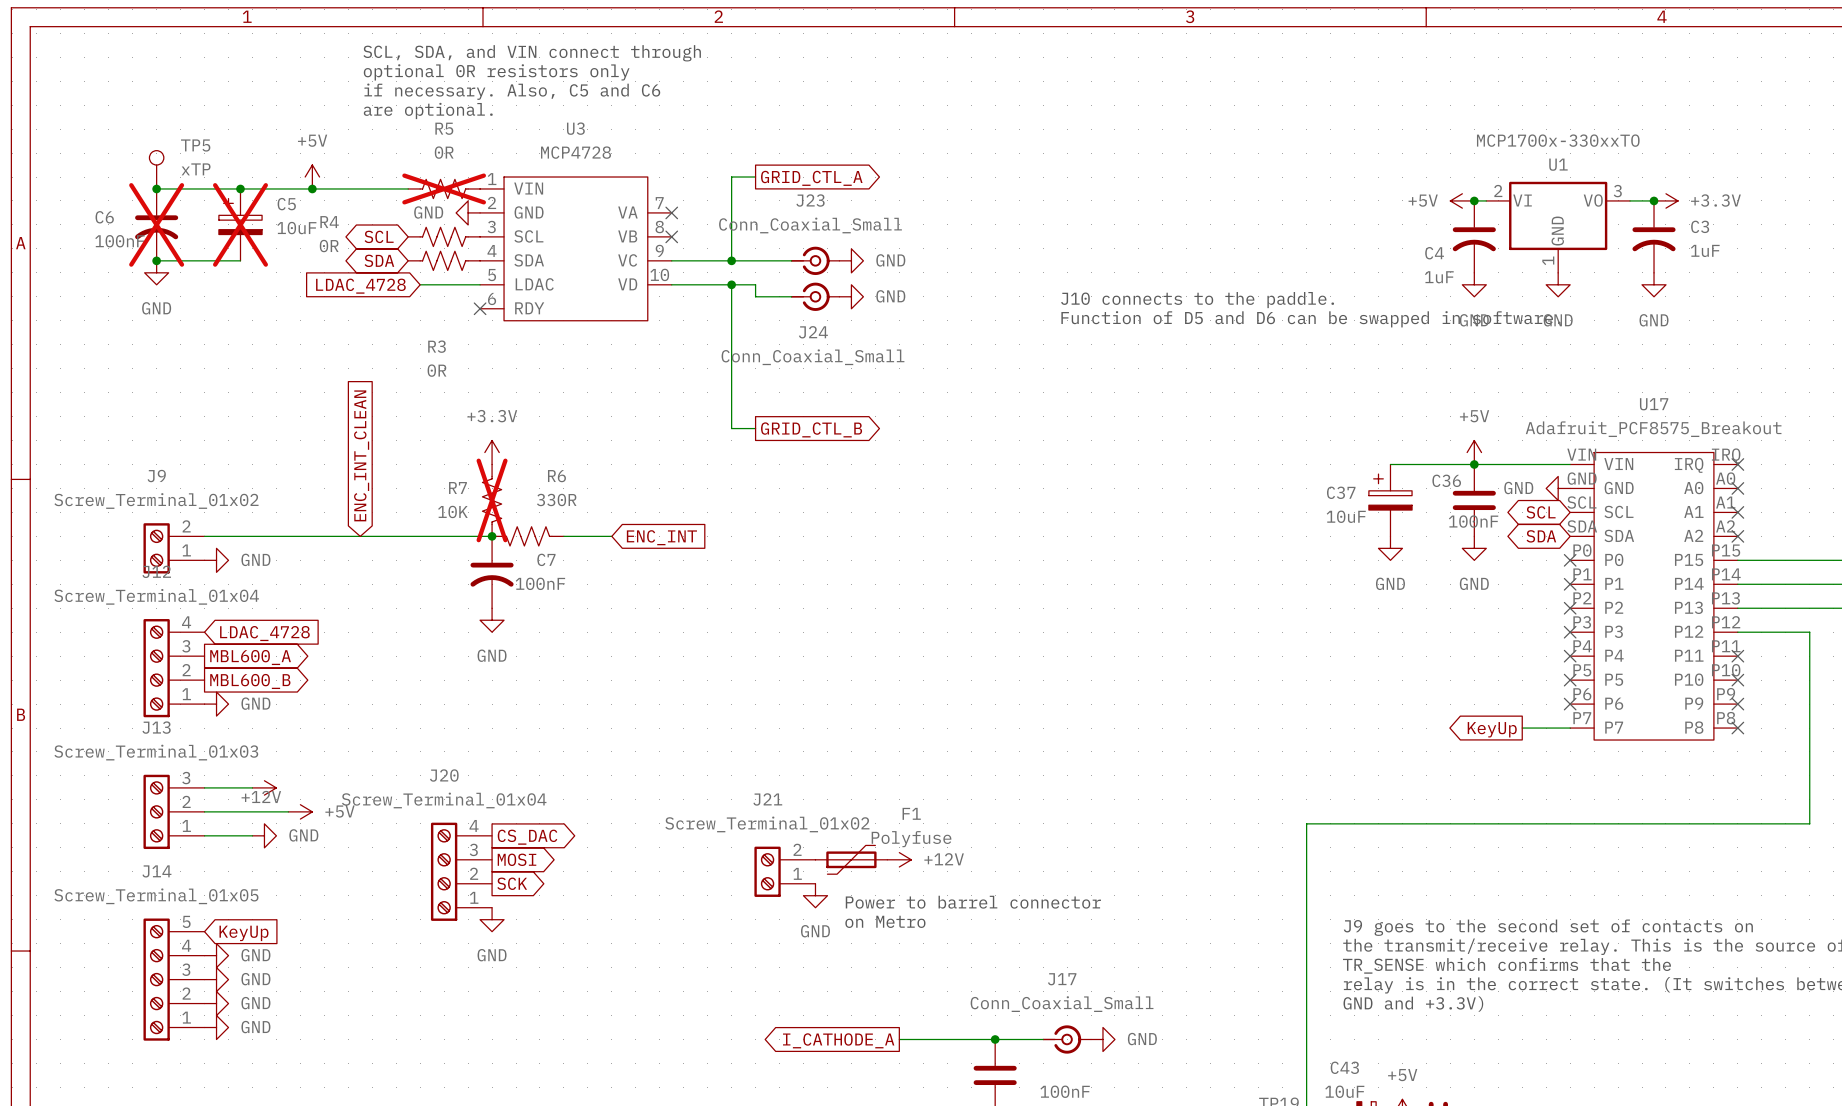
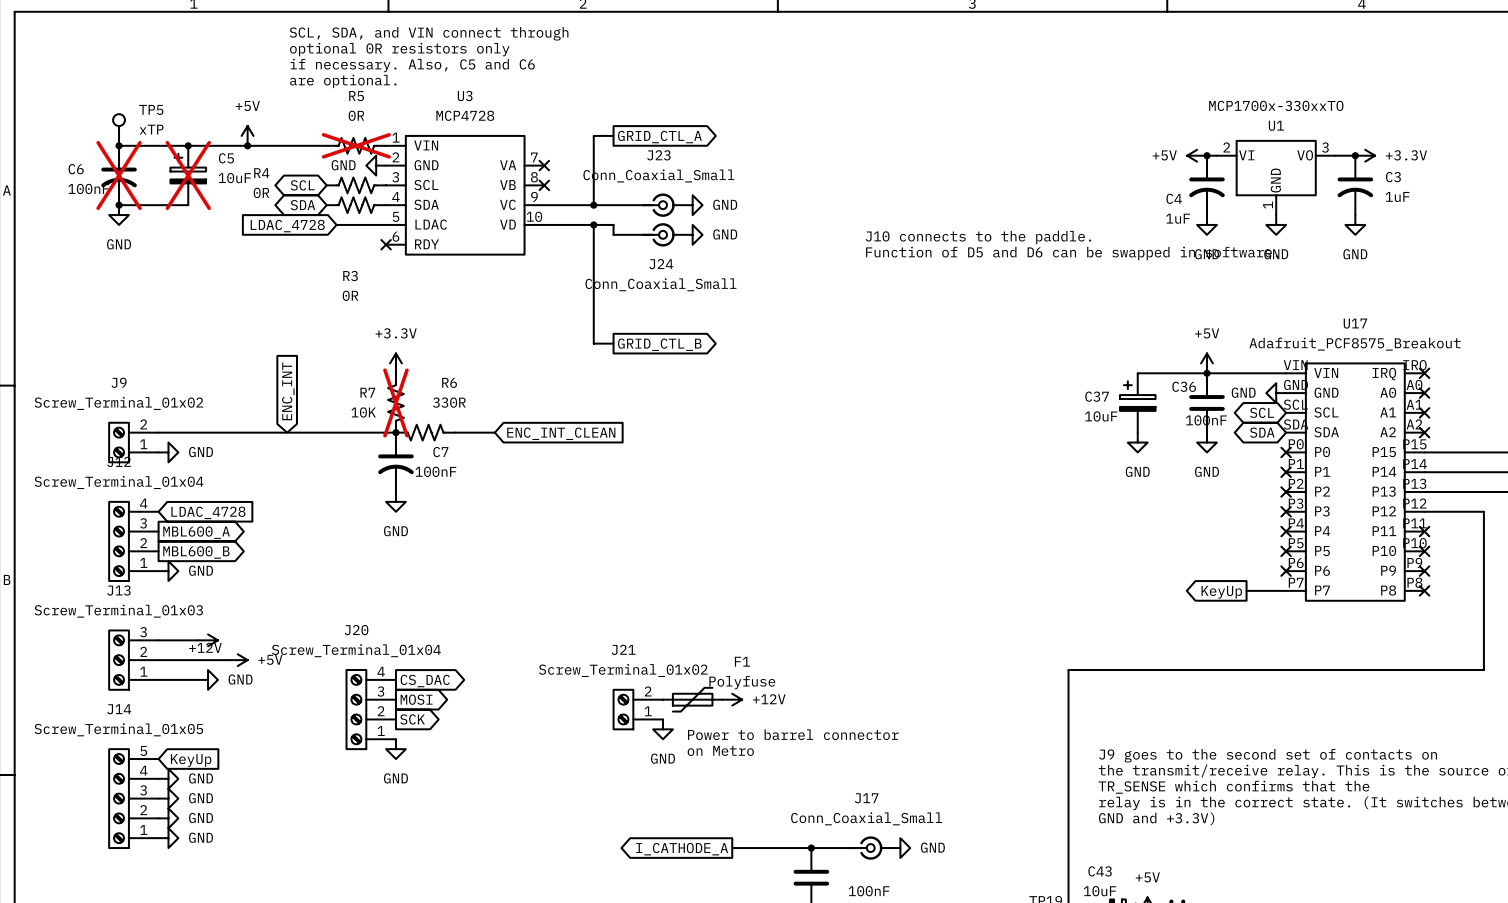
global label: ENC_INT_CLEAN (361, 455) -> ENC_INT (288, 391)
global label: ENC_INT (661, 537) -> ENC_INT_CLEAN (561, 433)

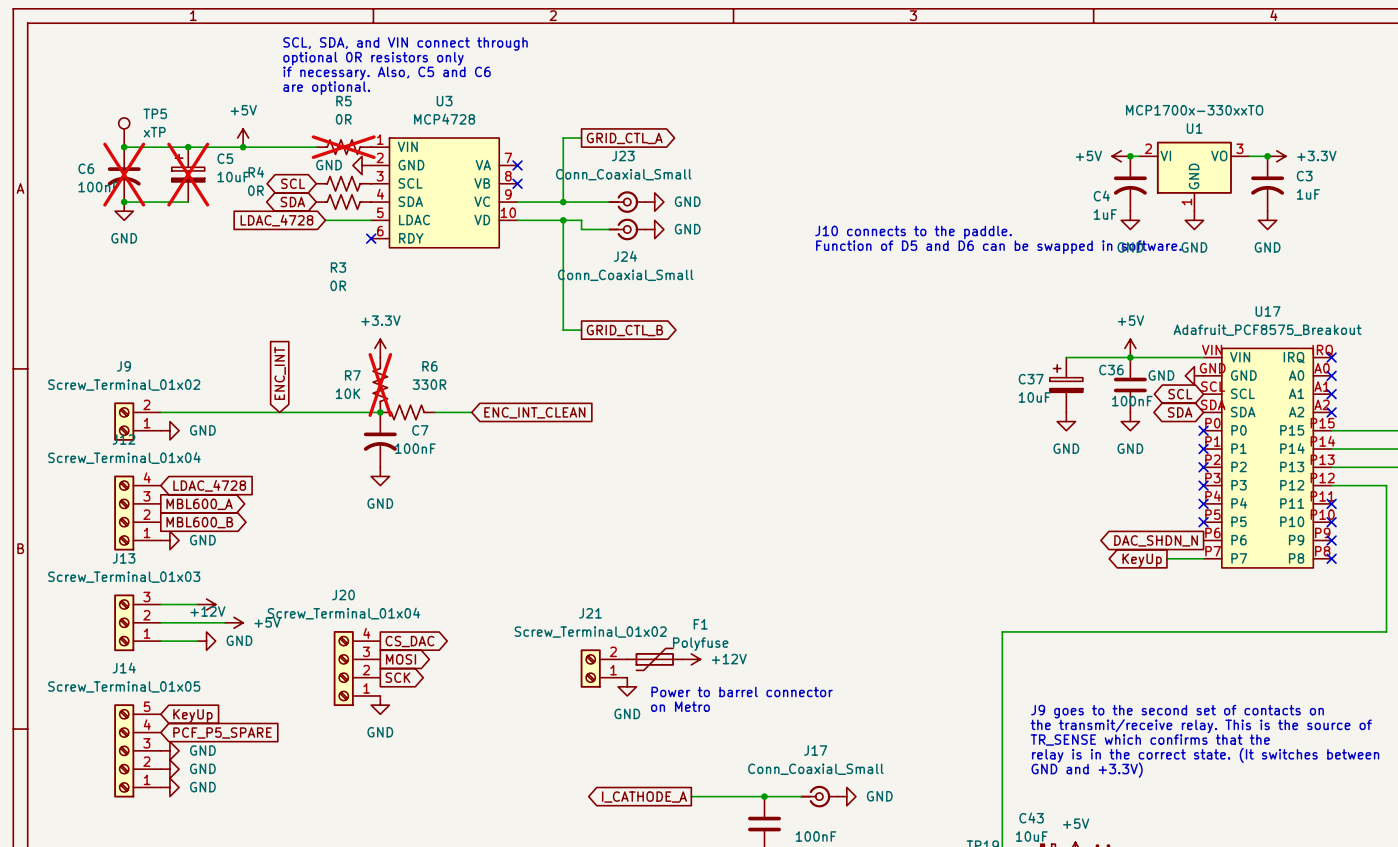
no-connect mark: (1286, 571) -> none
global label: none -> DAC_SHDN_N (1156, 540)
power symbol: GND (168, 778) -> none
global label: none -> PCF_P5_SPARE (222, 733)

